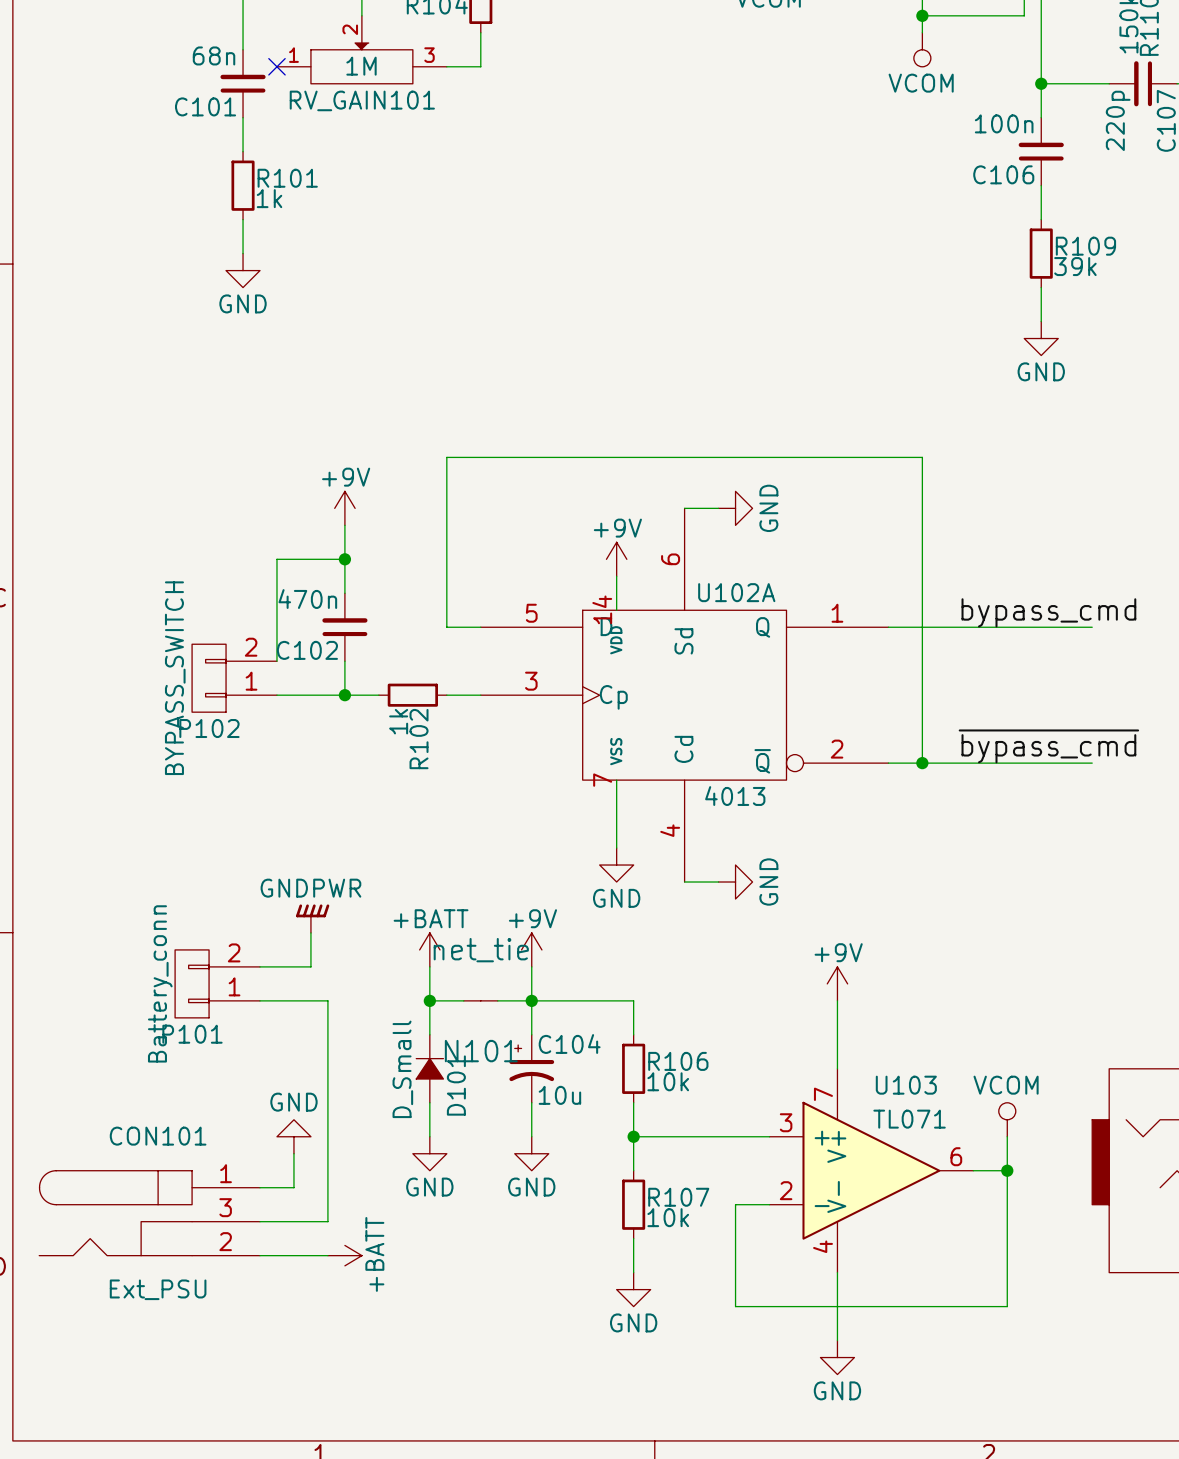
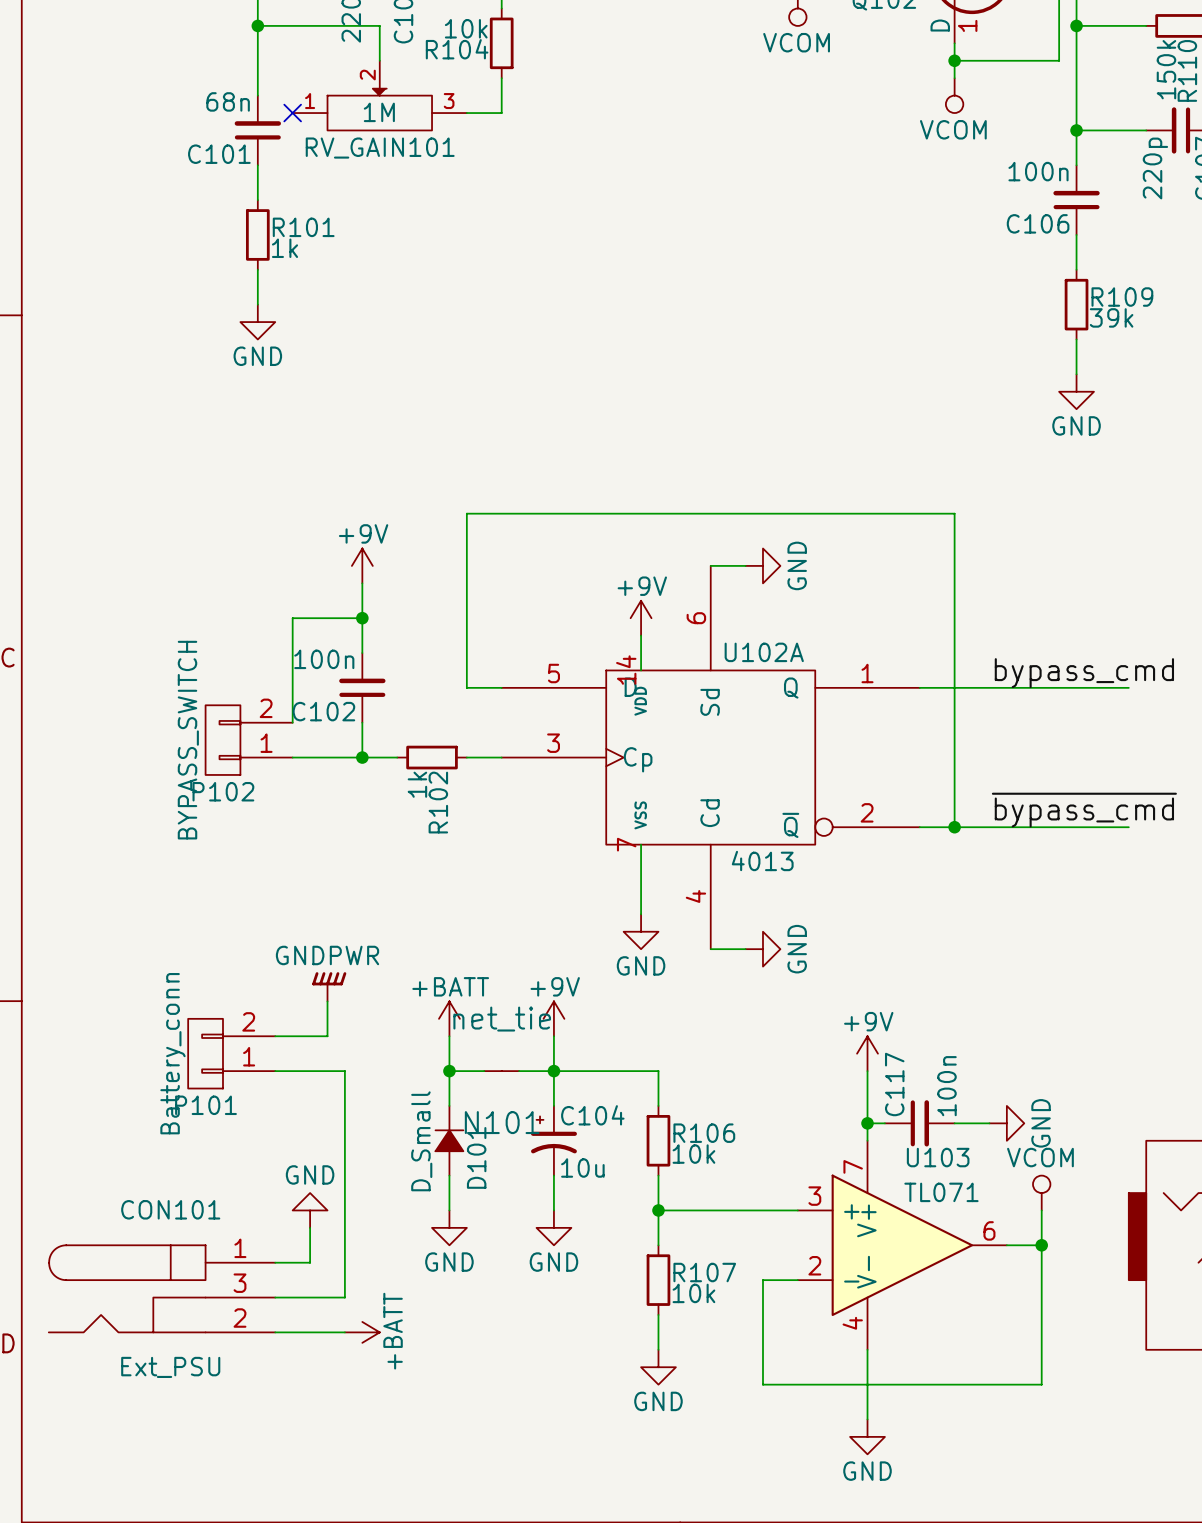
C102 value: 470n (307, 599) -> 100n (324, 659)
wire: none -> (867, 1123) (884, 1123)
junction: none -> (867, 1123)
C117: none -> 100n (919, 1123)
wire: none -> (954, 1123) (989, 1123)
power symbol: none -> GND (1006, 1123)

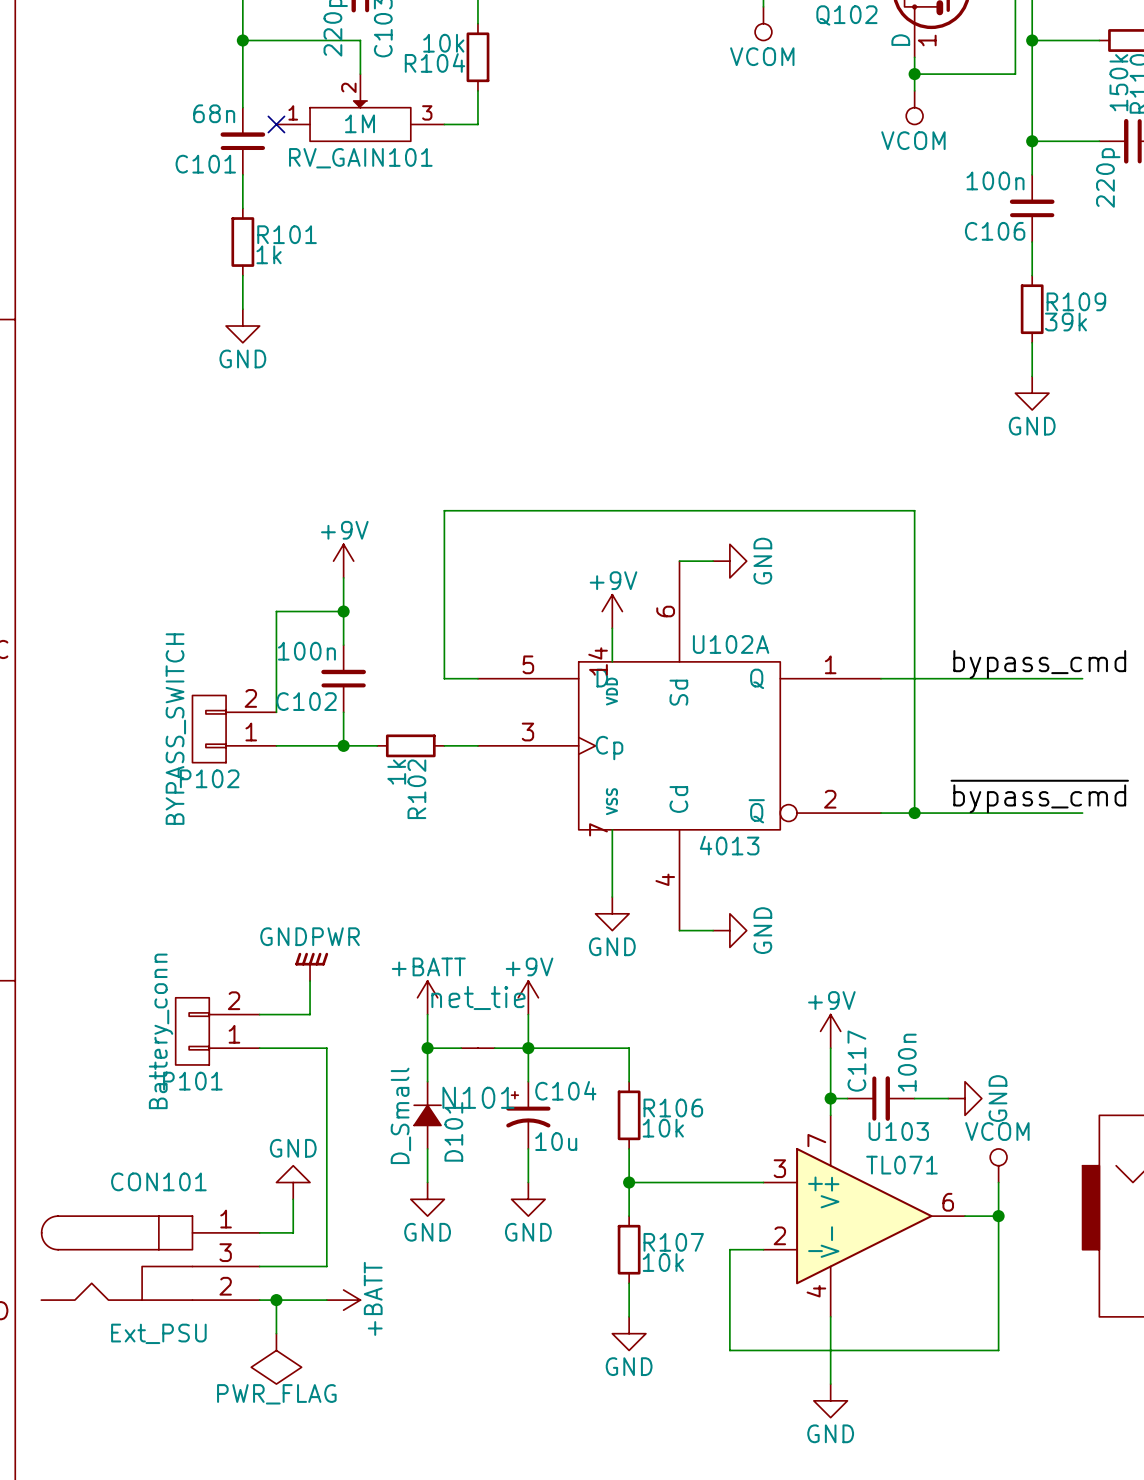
wire: none -> (276, 1300) (276, 1333)
junction: none -> (276, 1300)
power symbol: none -> PWR_FLAG (276, 1358)

